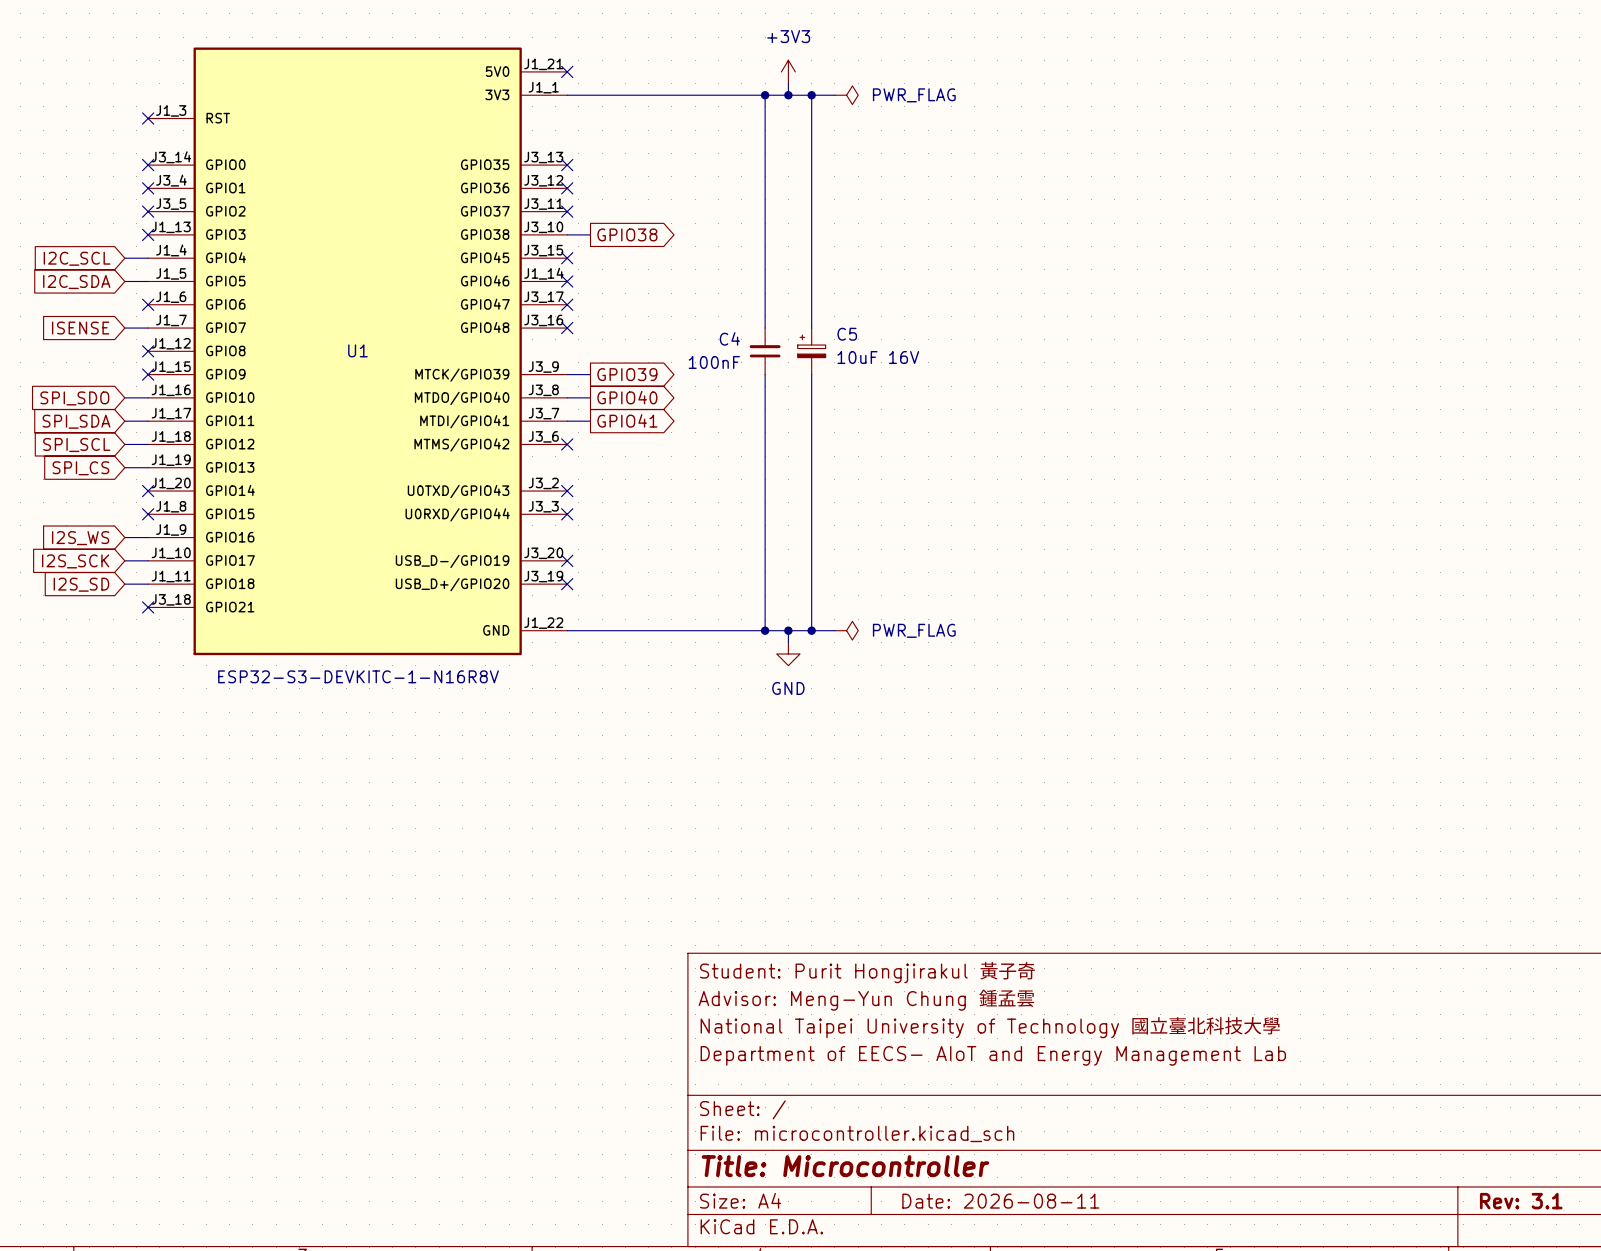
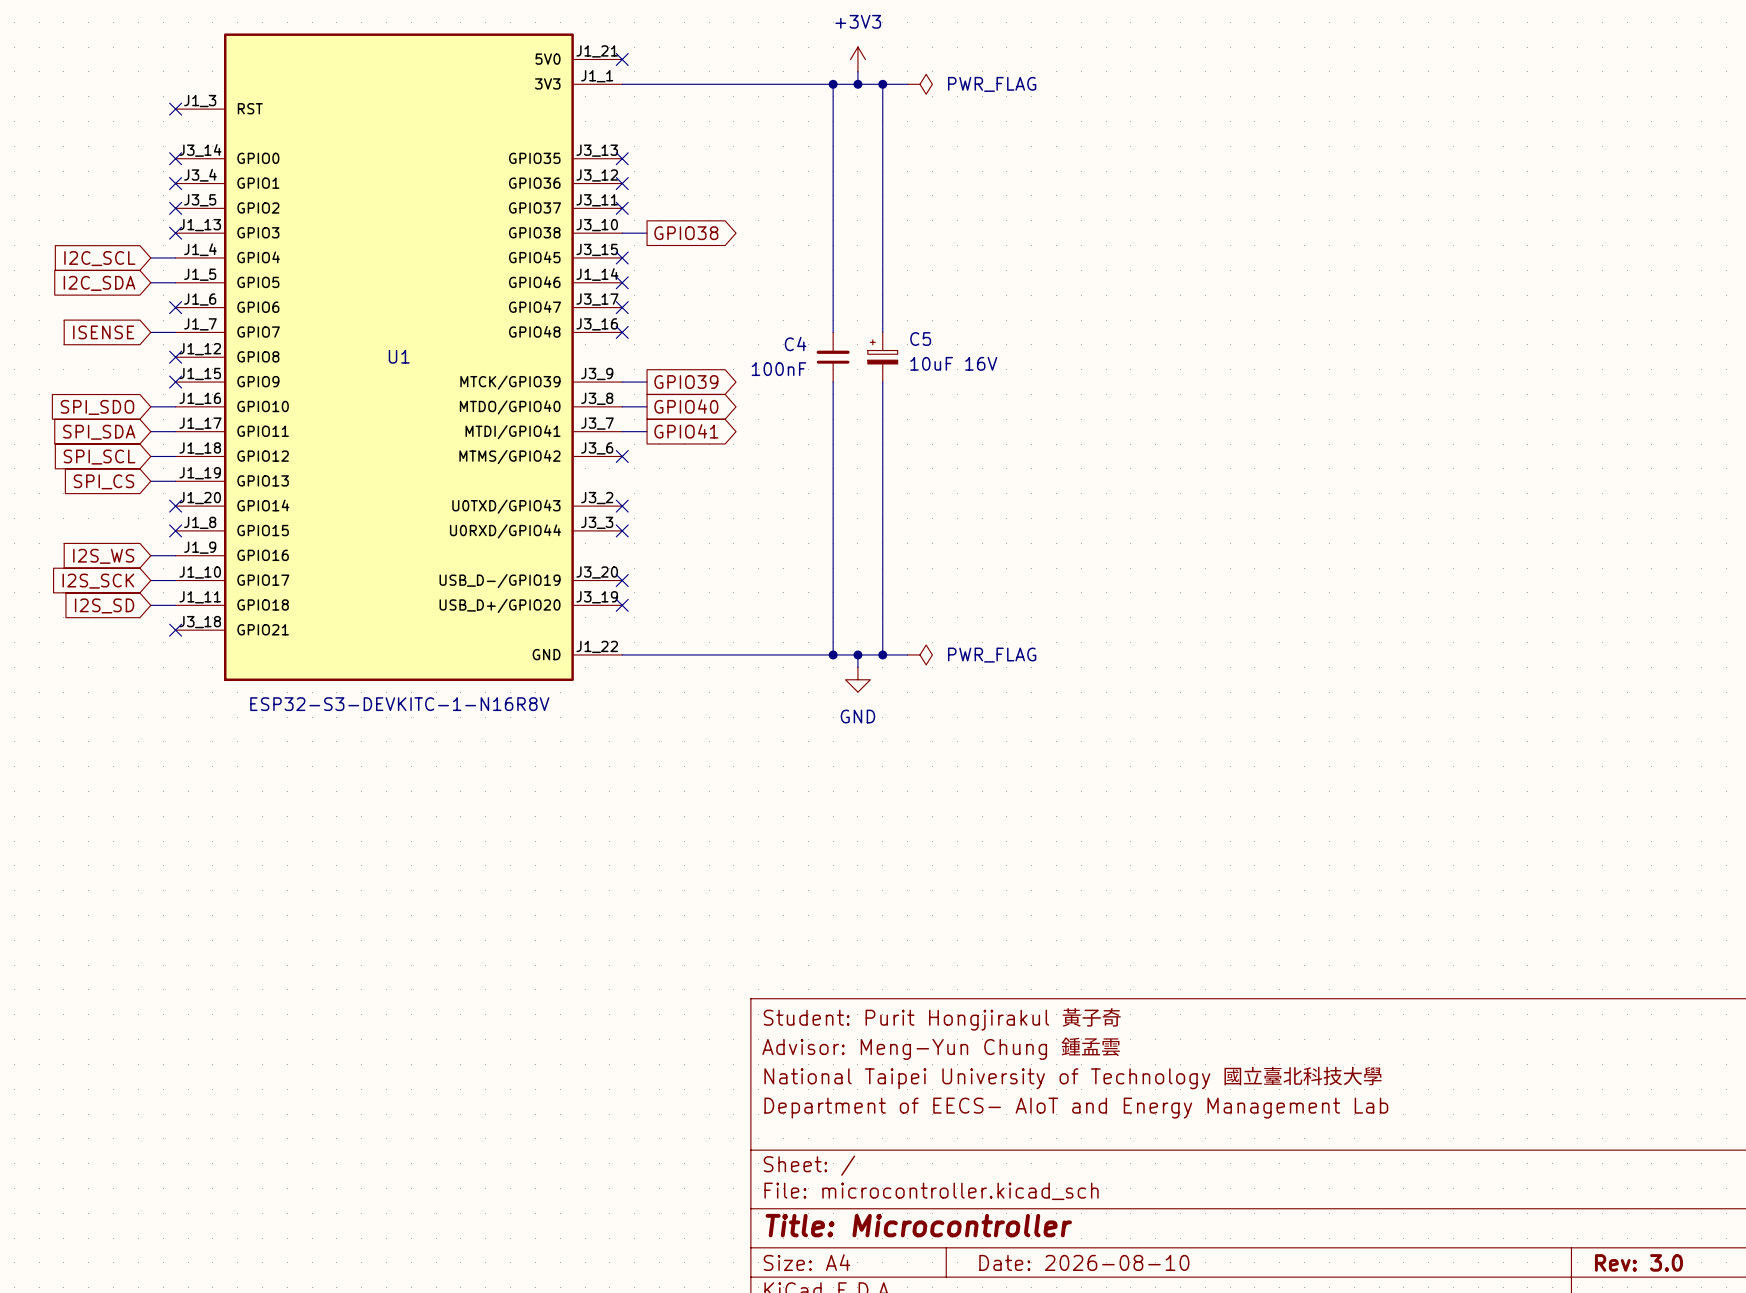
title block: Date: 2026-08-11 (1000, 1201) -> Date: 2026-08-10 (1084, 1262)
title block: Rev: 3.1 (1521, 1201) -> Rev: 3.0 (1638, 1262)

